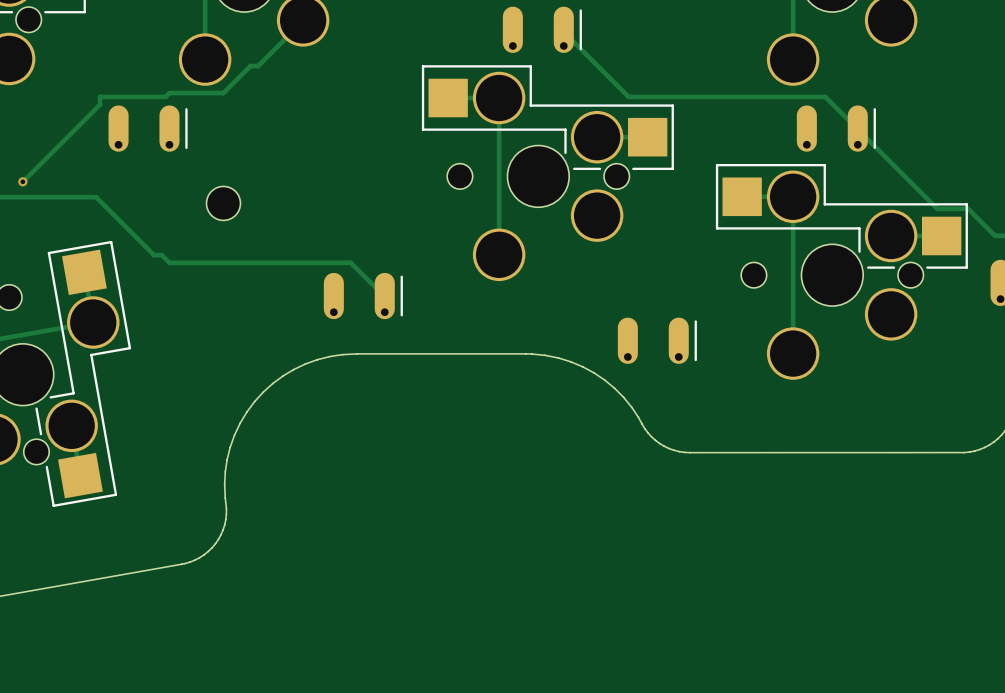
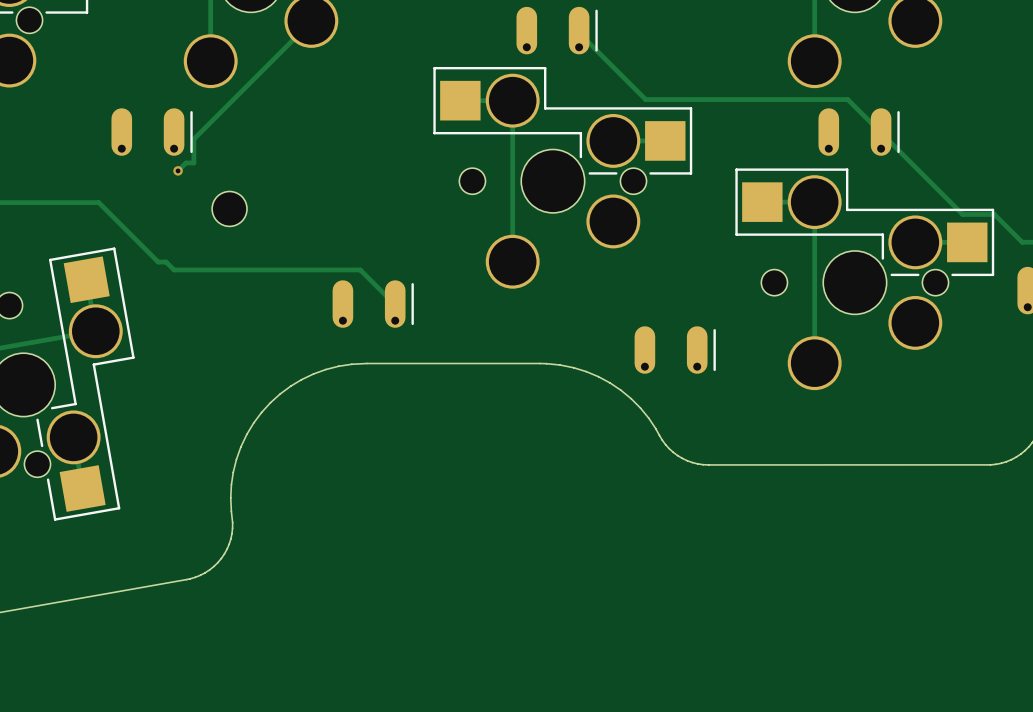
track: (258, 66) (250, 66) (223, 93) (169, 93) (165, 96) (100, 96) (100, 104) (22, 181) -> (265, 67) (193, 139) (193, 162) (185, 162) (178, 170)
via: none -> (178, 170)
via: (22, 181) -> none

